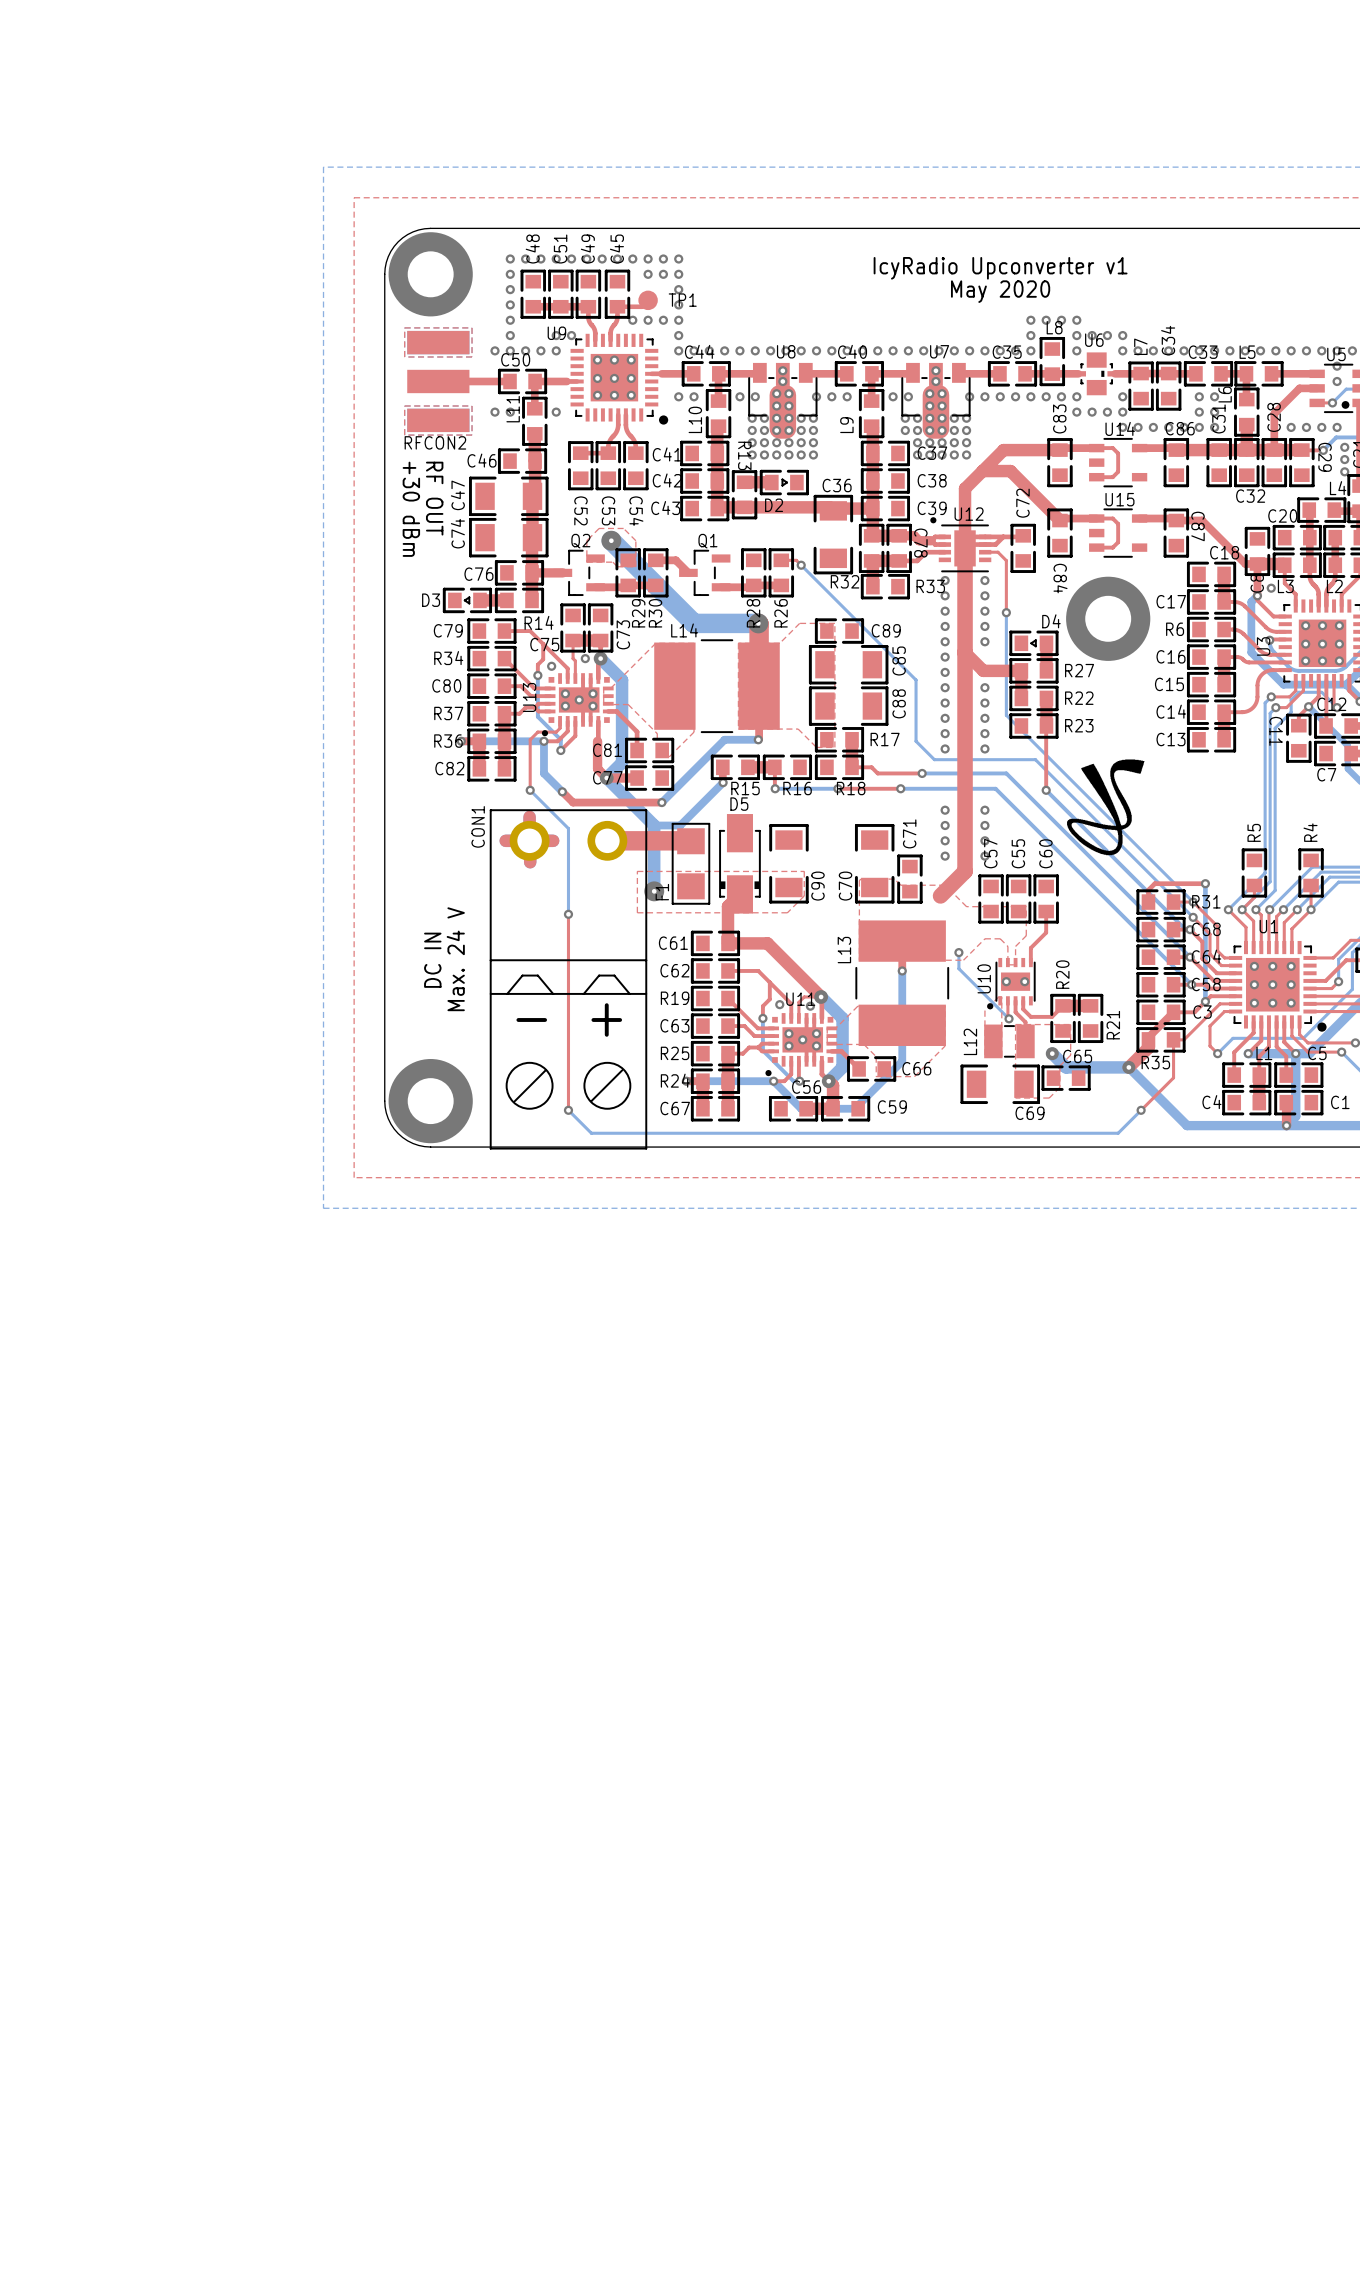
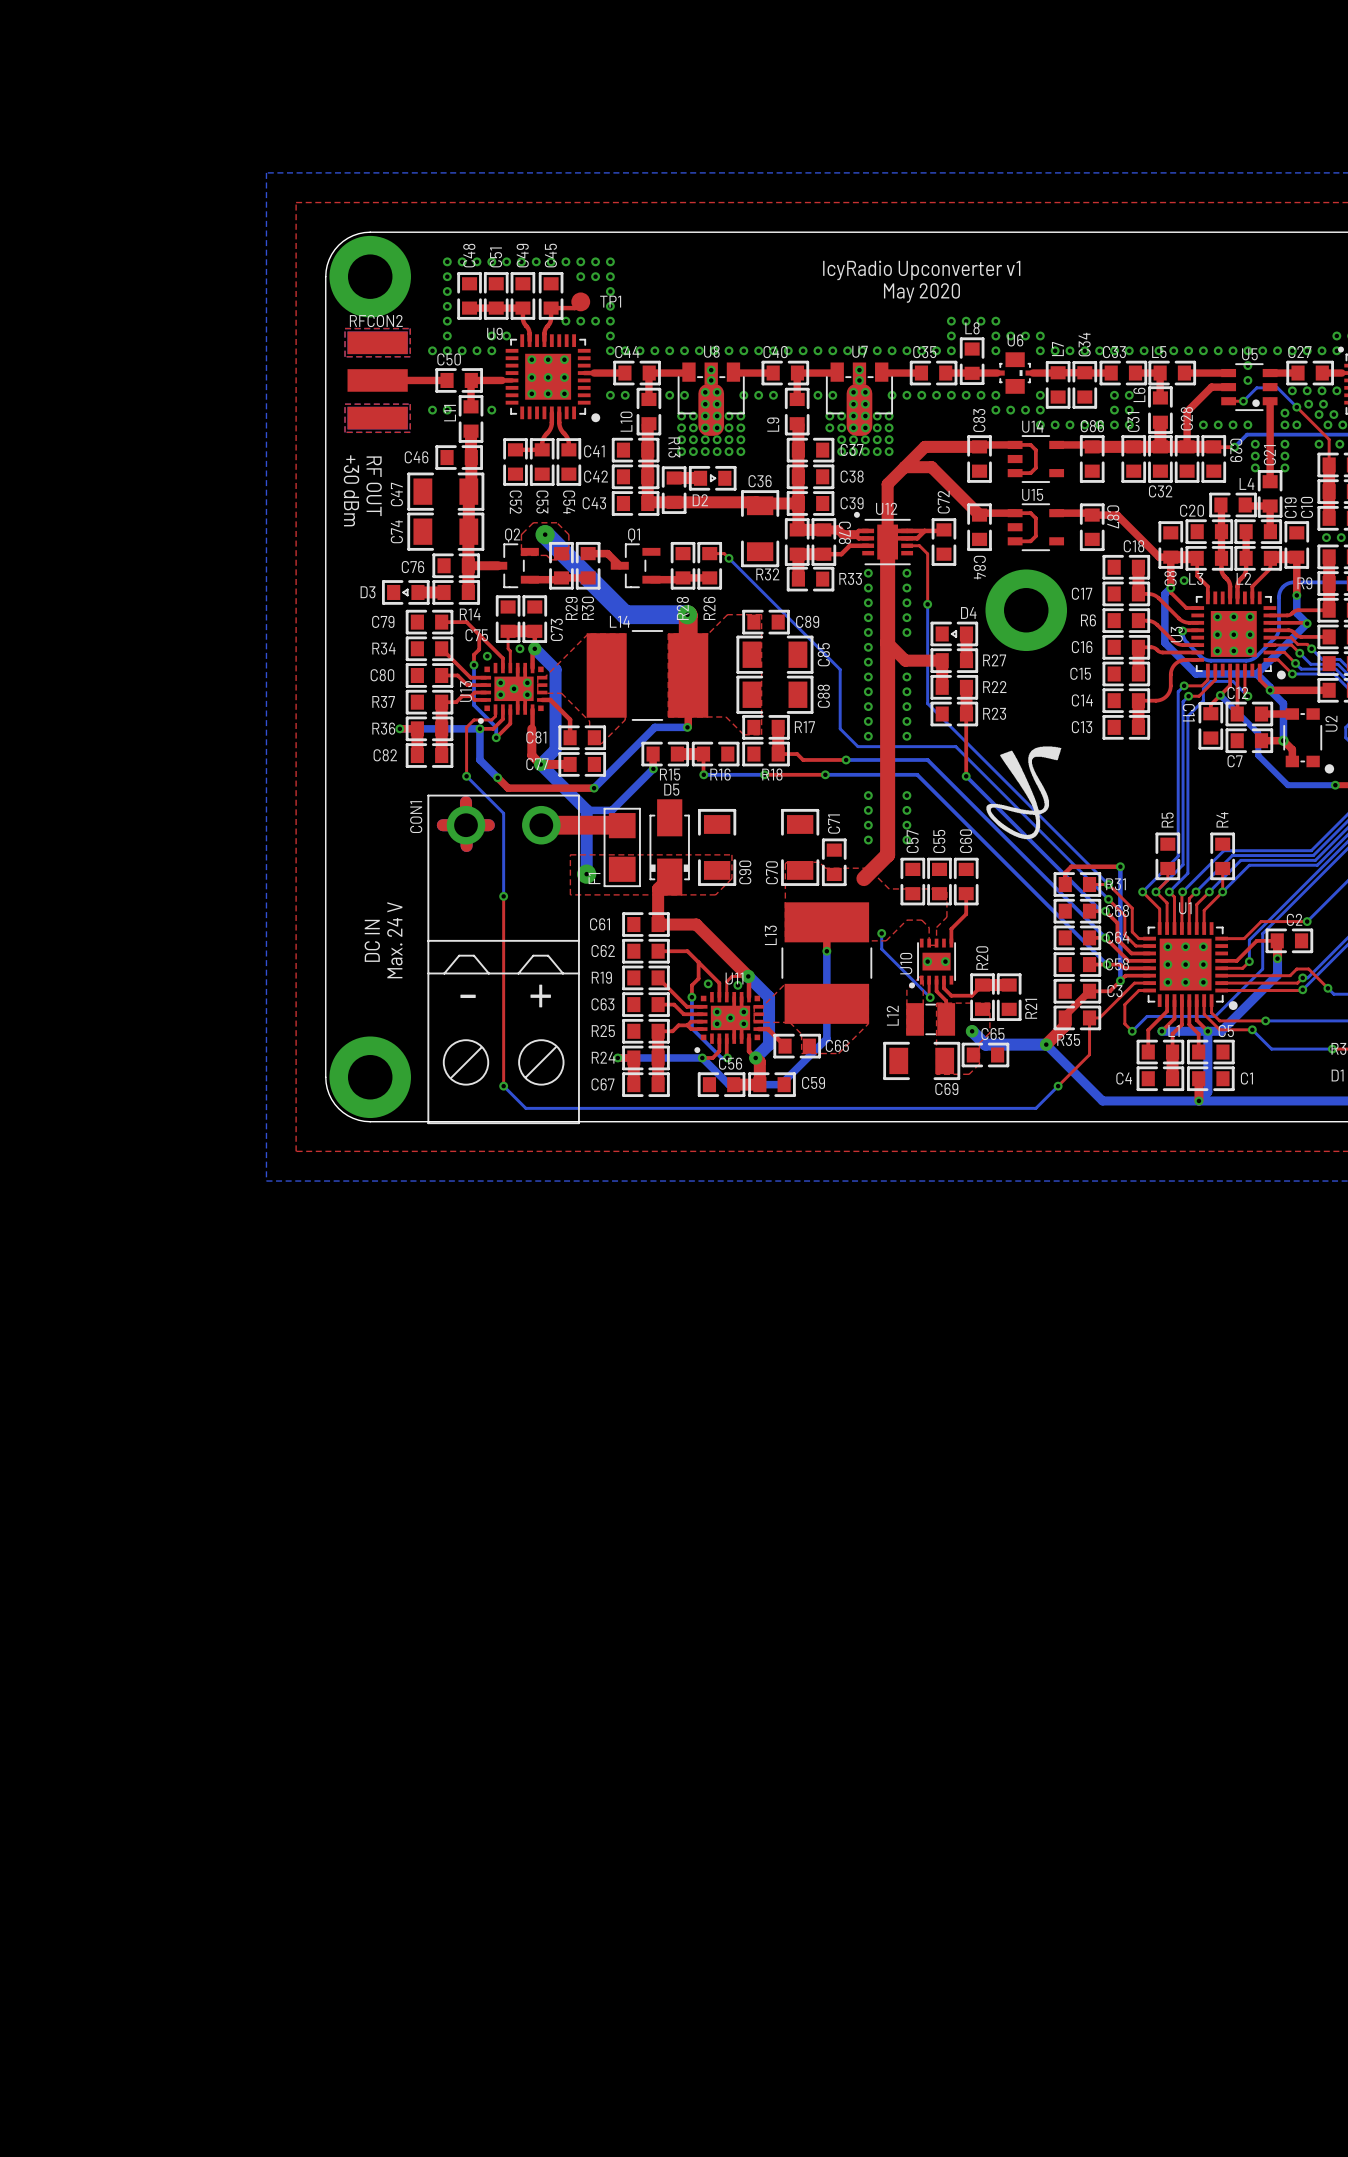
RFCON2 name position: RFCON2 (435, 442) -> RFCON2 (376, 321)

